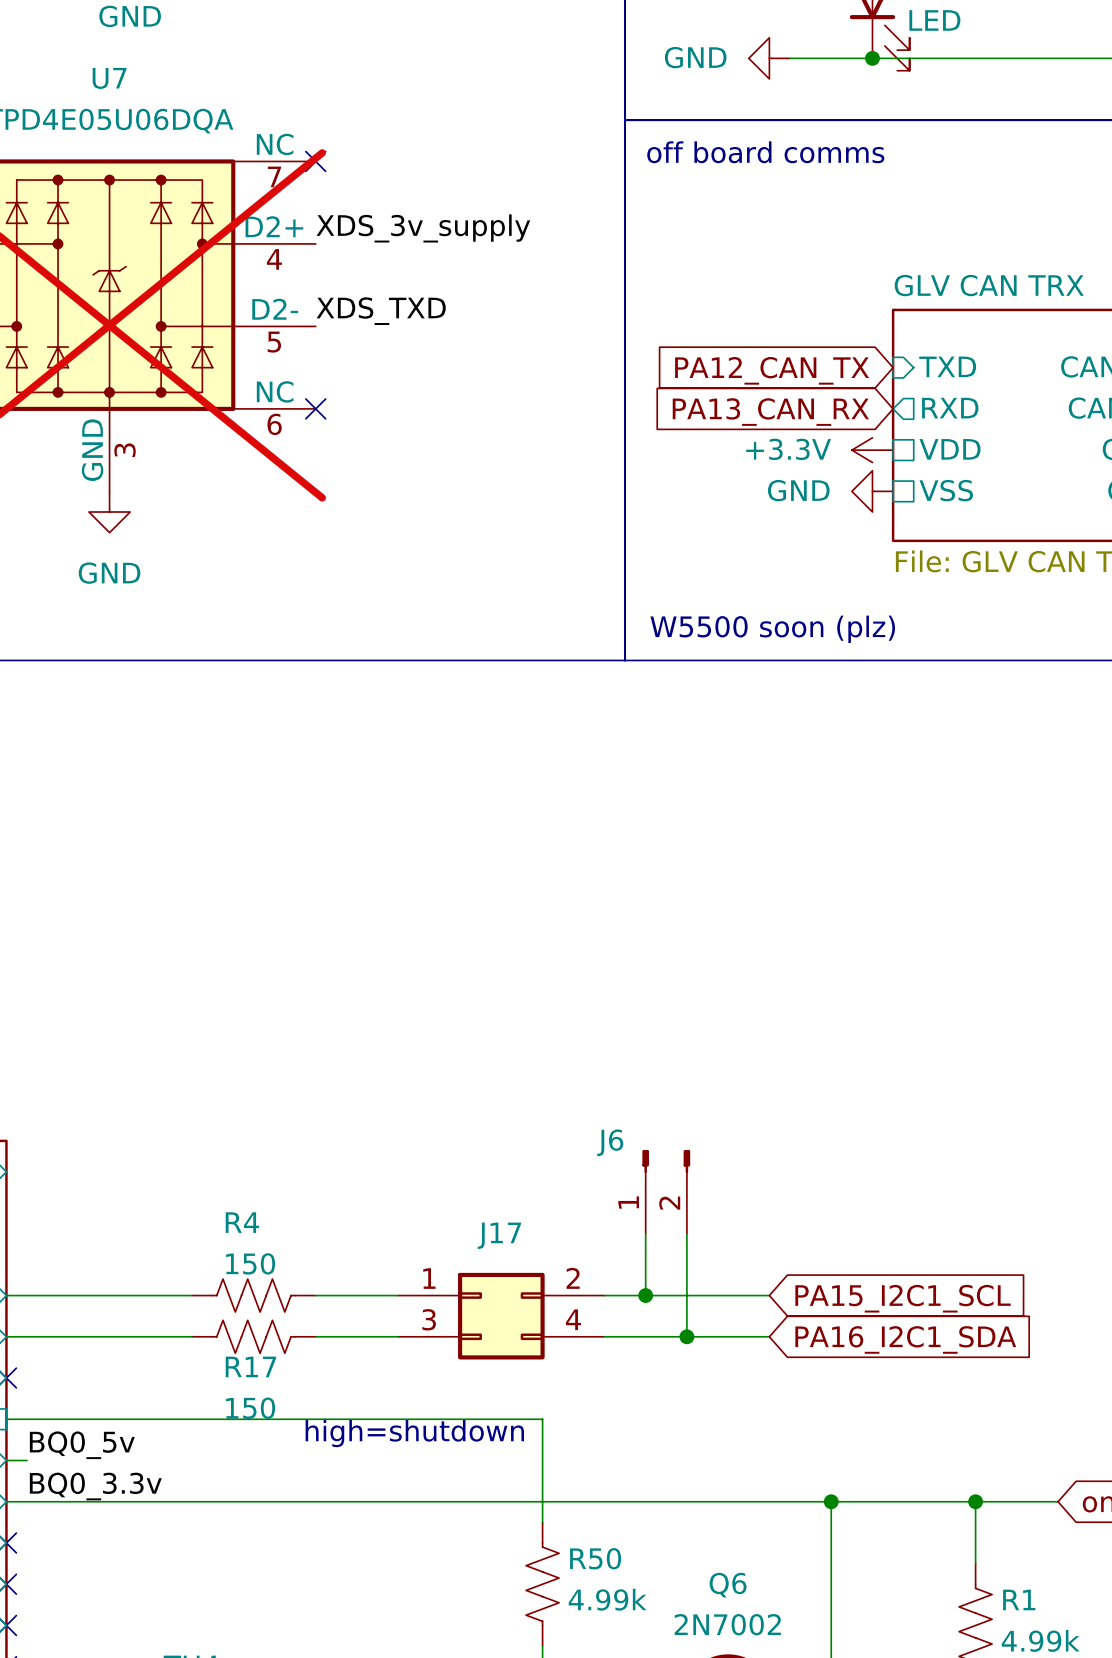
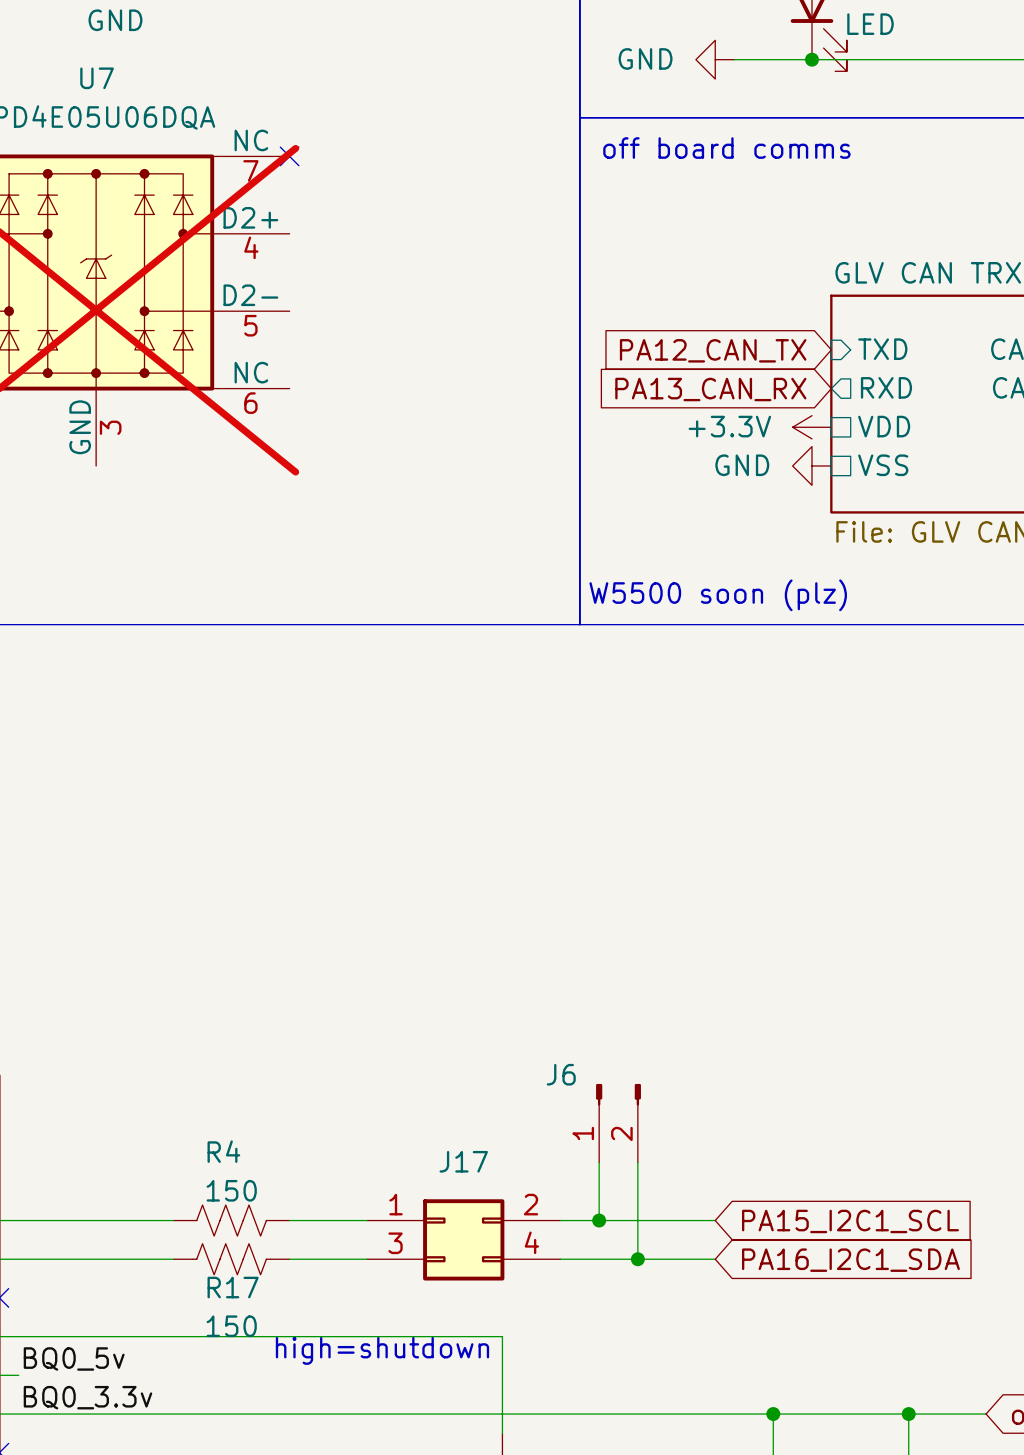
label: XDS_3v_supply (423, 228) -> none
label: XDS_TXD (381, 311) -> none
no-connect mark: (315, 408) -> none
power symbol: GND (109, 512) -> none

